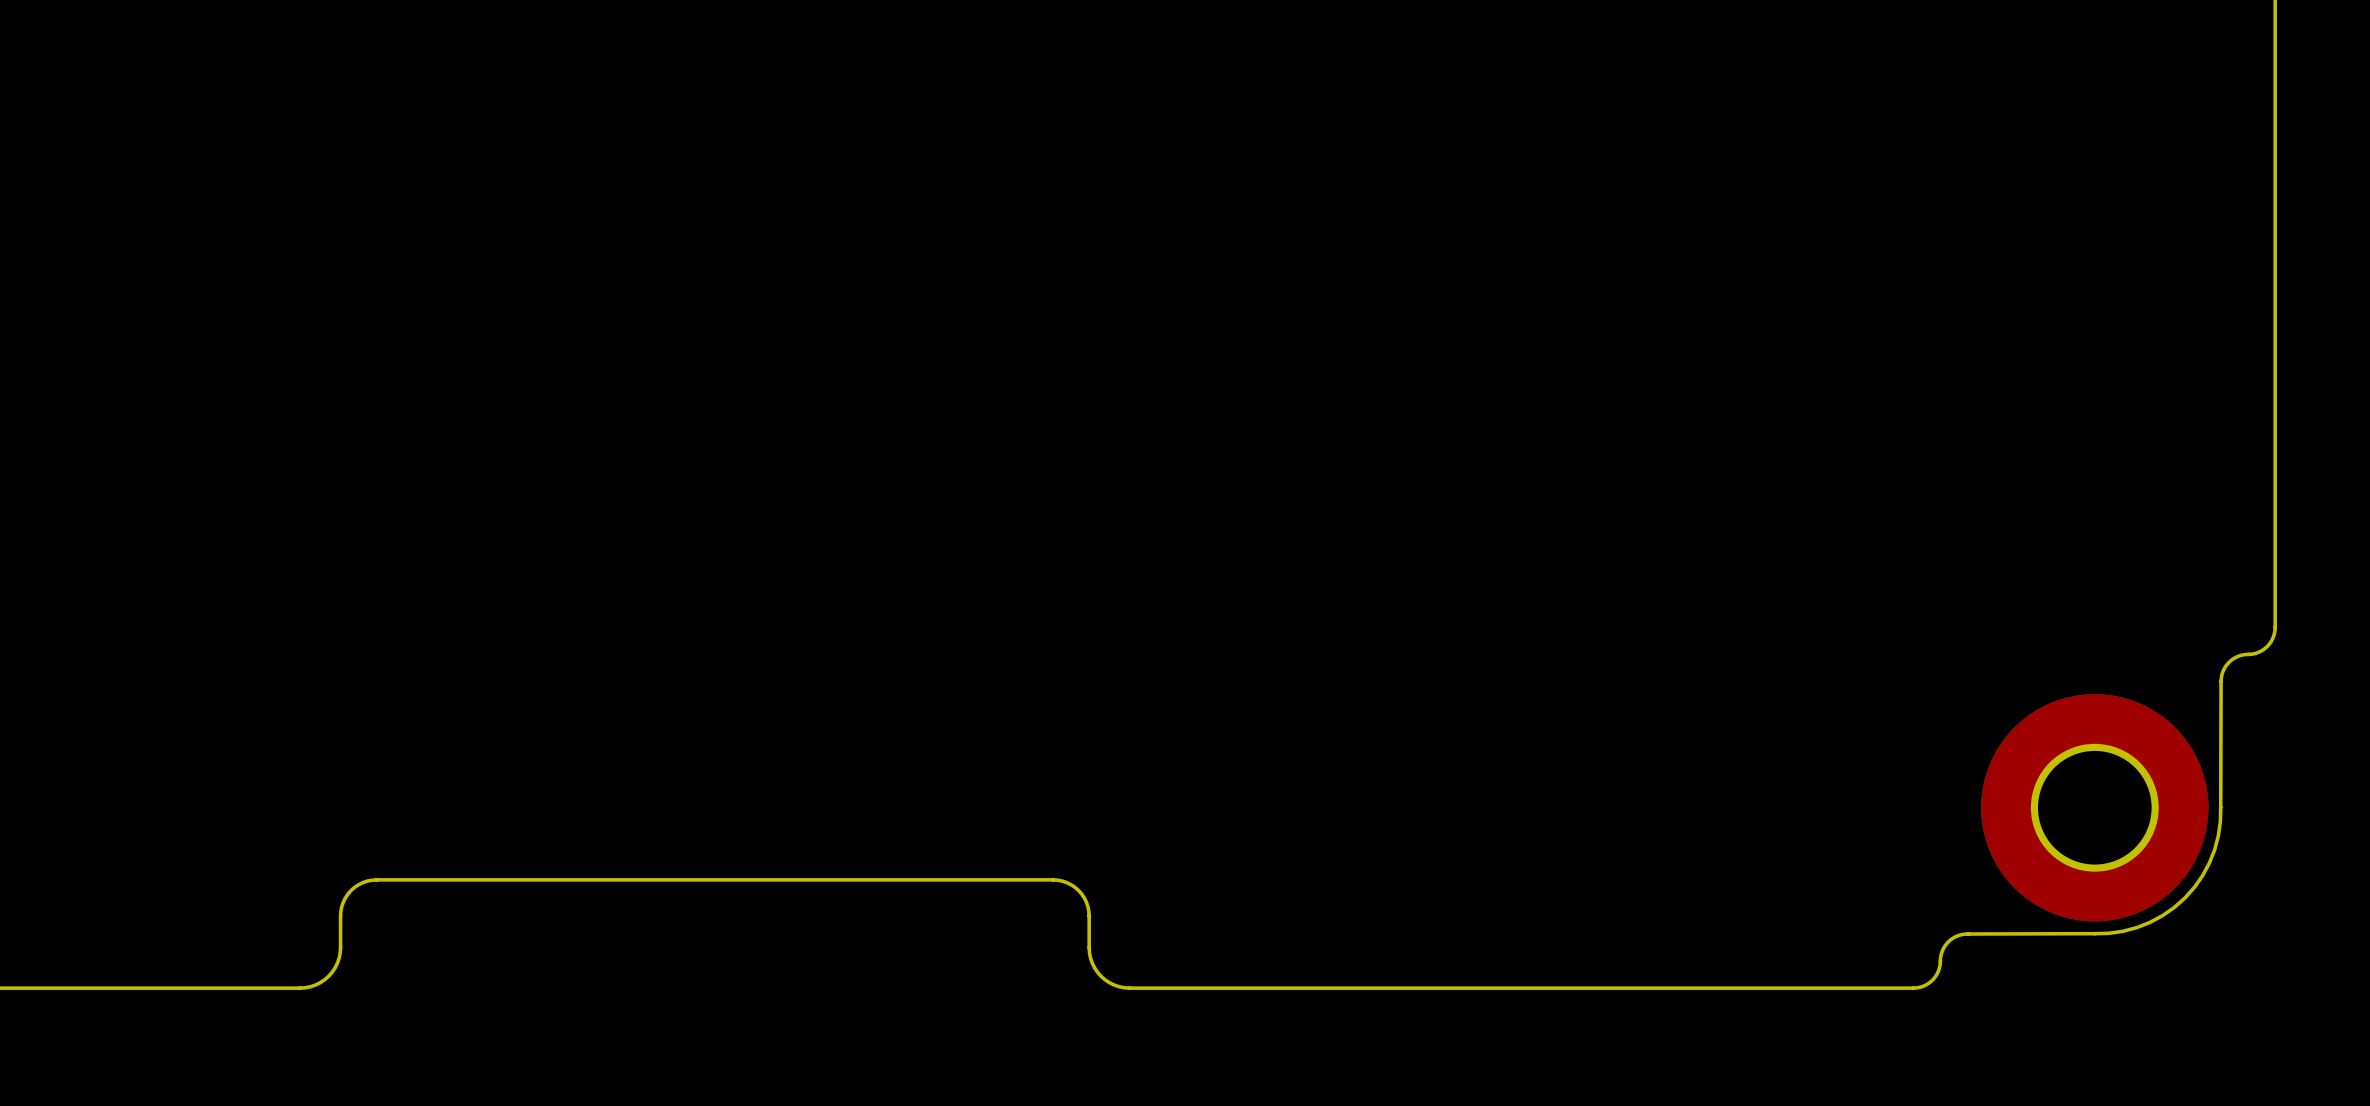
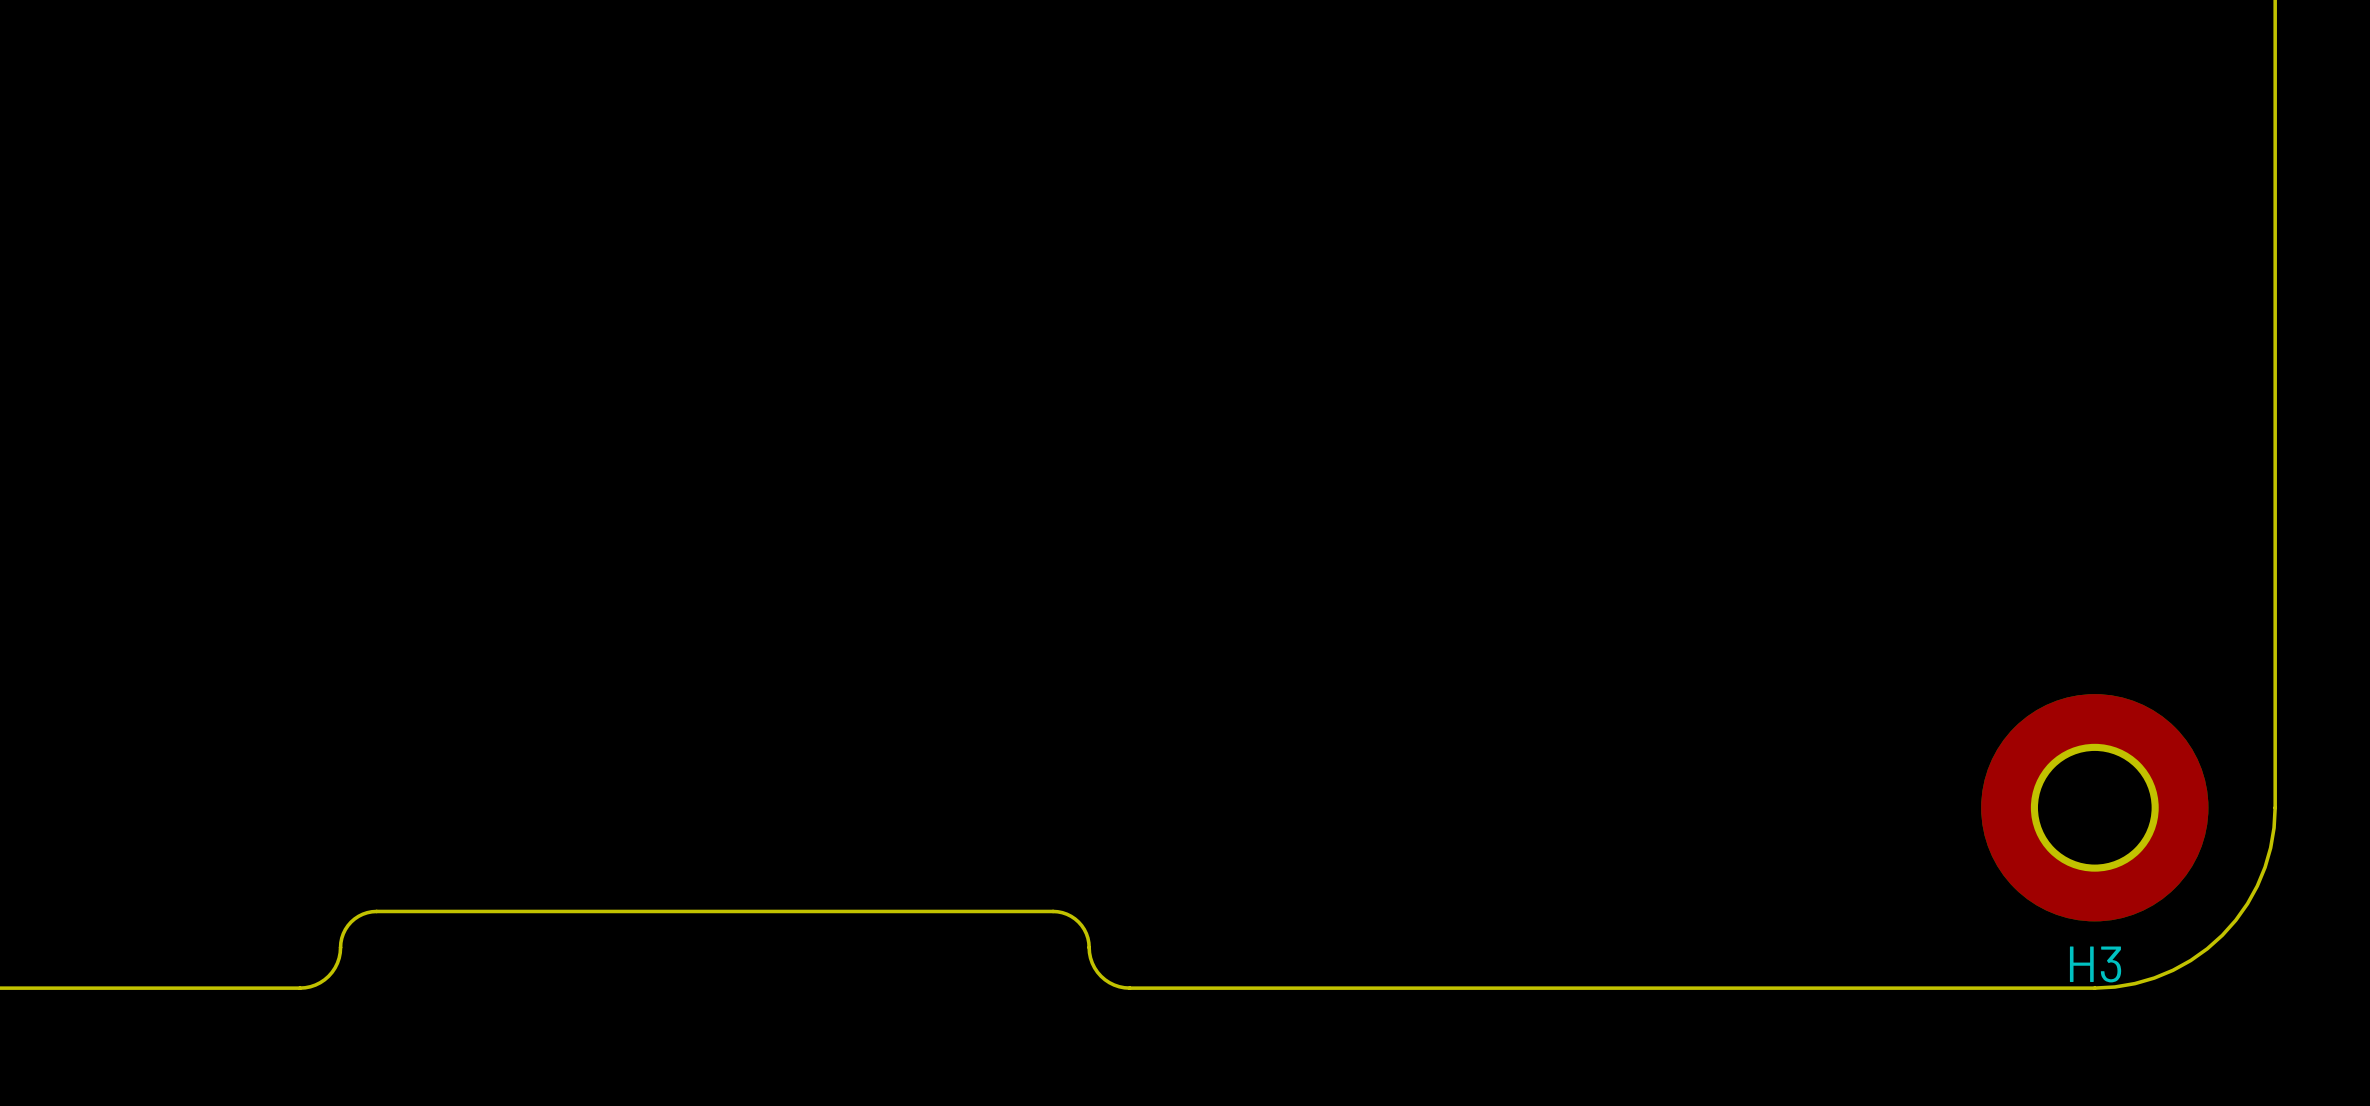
board edge: (2275, 627) (2273, 637) (2267, 646) (2258, 652) (2234, 658) (2226, 665) (2221, 674) (2220, 807) (2218, 835) (2214, 849) (2202, 875) (2184, 897) (2162, 915) (2150, 922) (2122, 931) (2094, 933) (1959, 935) (1951, 939) (1944, 946) (1941, 954) (1939, 968) (1934, 977) (1923, 986) (1913, 988) -> (2275, 627) (2275, 807) (2270, 847) (2257, 886) (2247, 903) (2222, 935) (2190, 960) (2154, 978) (2134, 983) (2094, 988) (1913, 988)
board edge: (340, 947) (340, 911) (345, 897) (358, 884) (376, 879) (1057, 880) (1075, 887) (1086, 902) (1089, 915) (1089, 947) -> (340, 947) (343, 933) (351, 922) (362, 914) (376, 911) (1053, 911) (1066, 914) (1078, 922) (1086, 933) (1089, 947)
H3 name: none -> H3 (2095, 964)

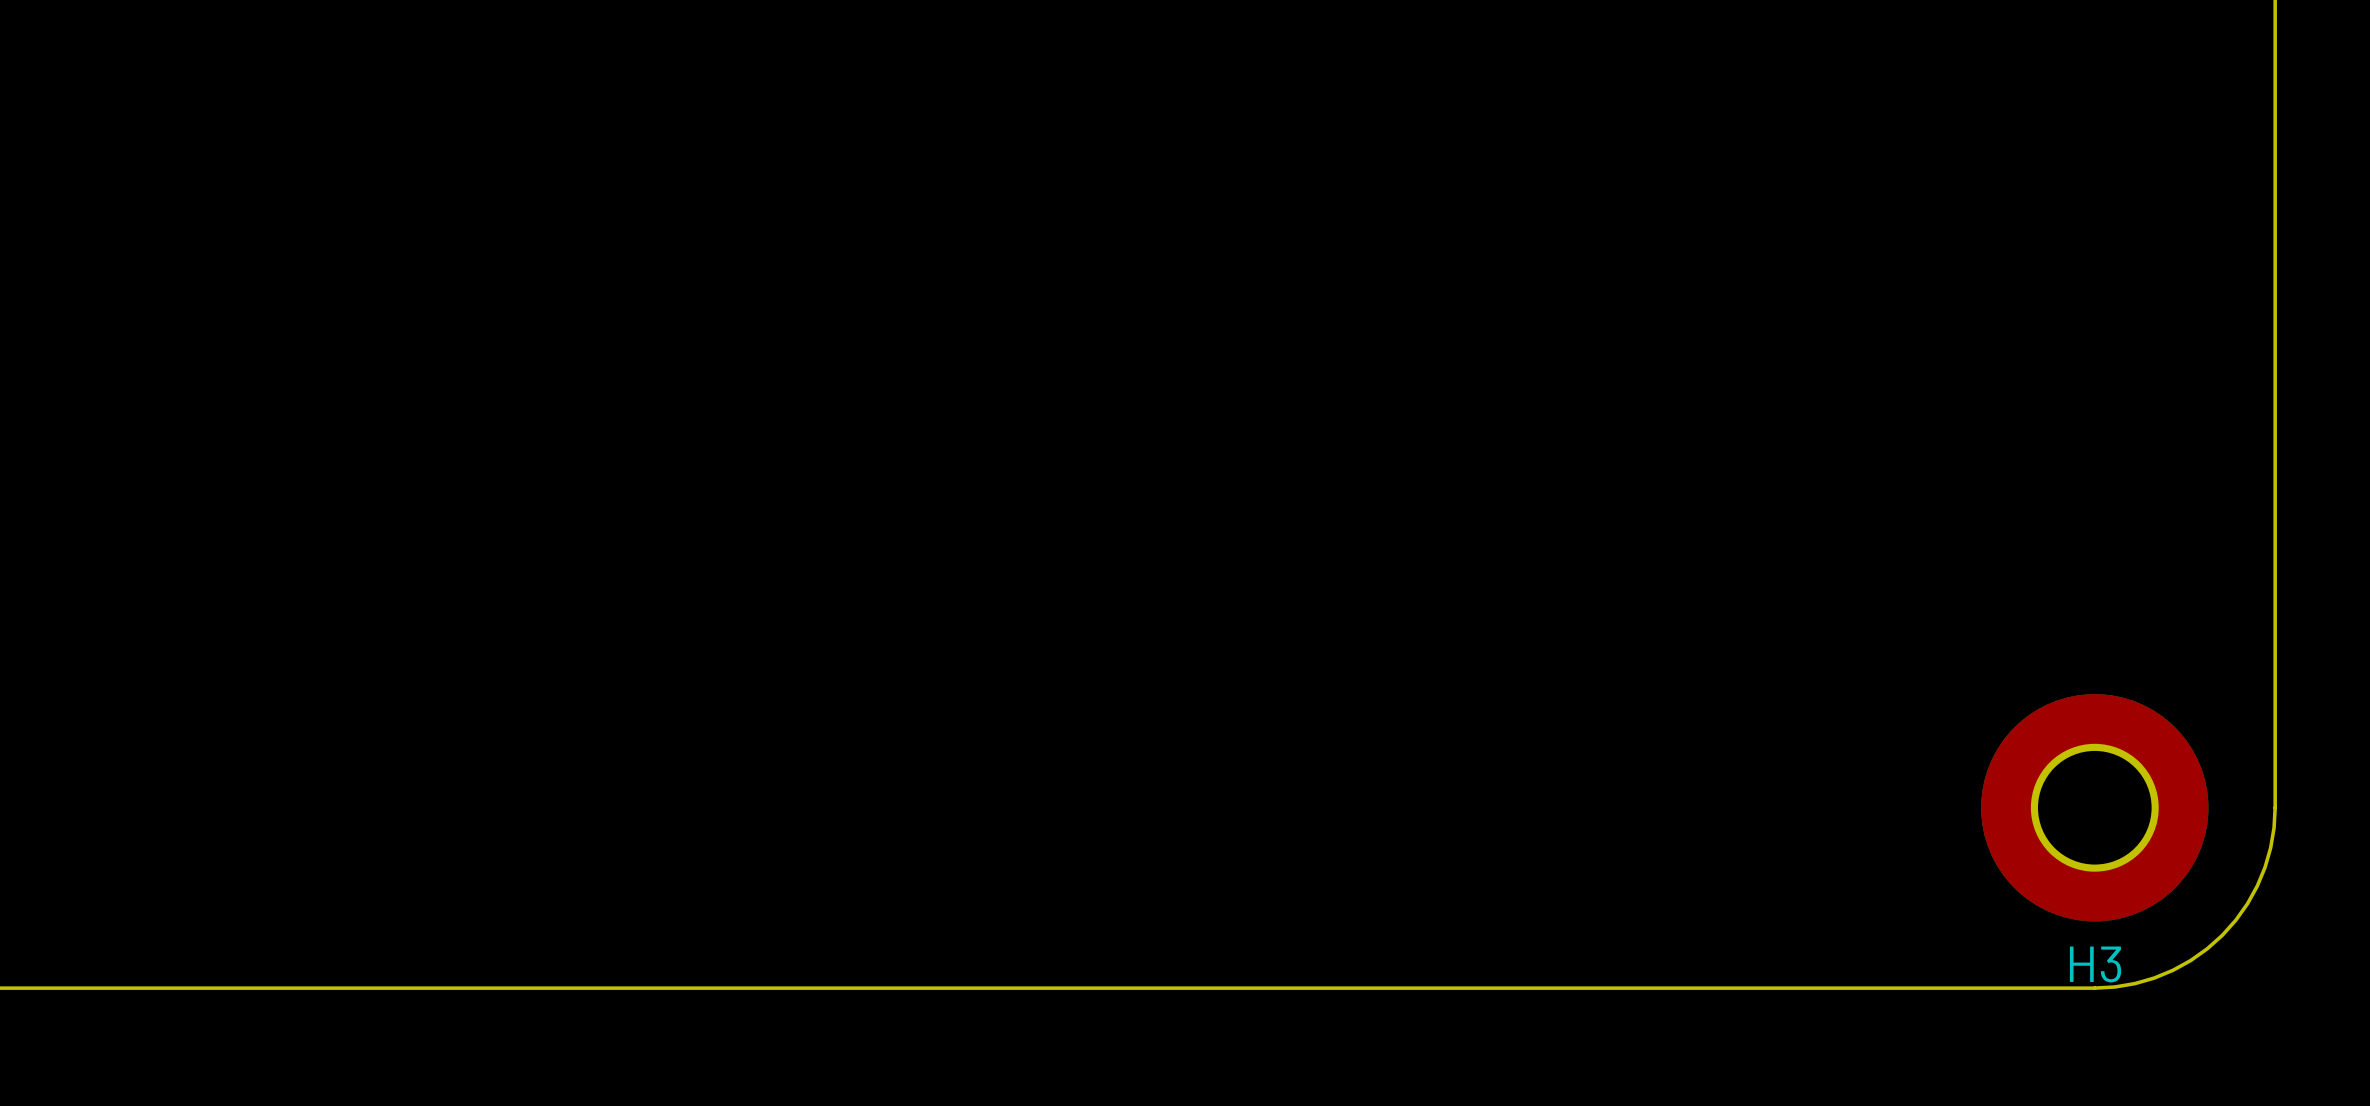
board edge: (299, 988) (315, 985) (328, 976) (337, 963) (341, 938) (348, 925) (362, 914) (376, 911) (1057, 911) (1071, 916) (1081, 925) (1087, 938) (1092, 963) (1101, 976) (1114, 985) (1129, 988) -> (299, 988) (1129, 988)

